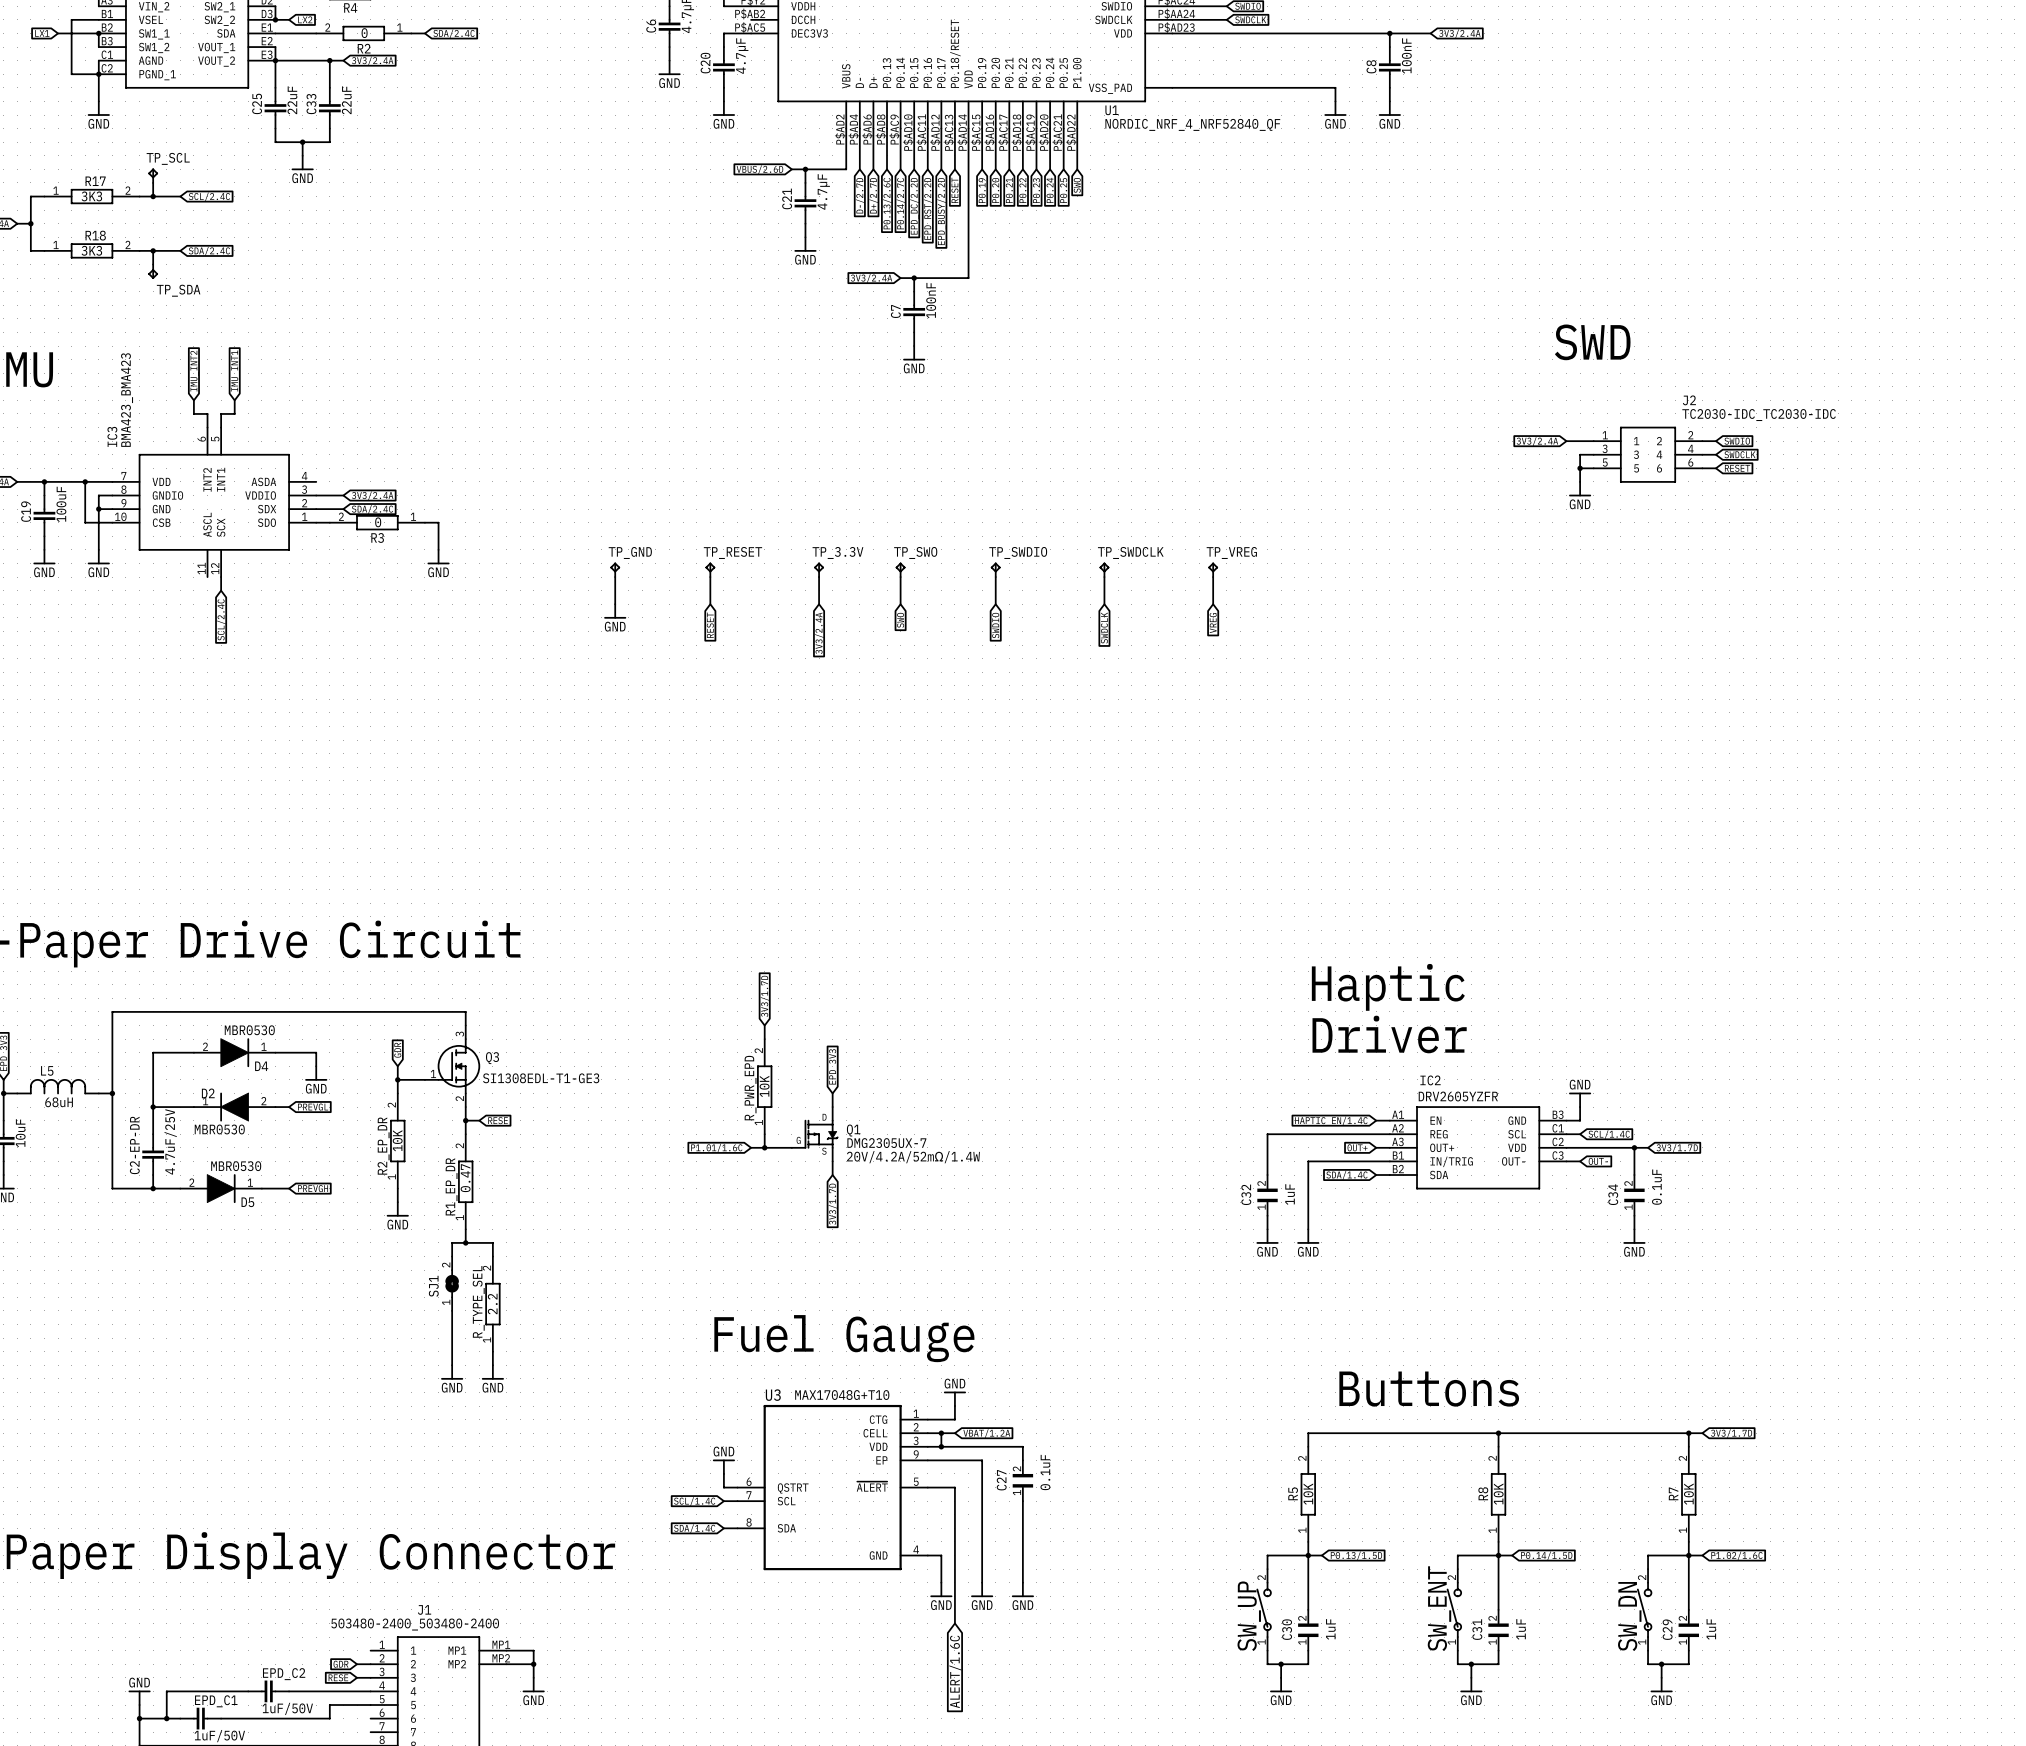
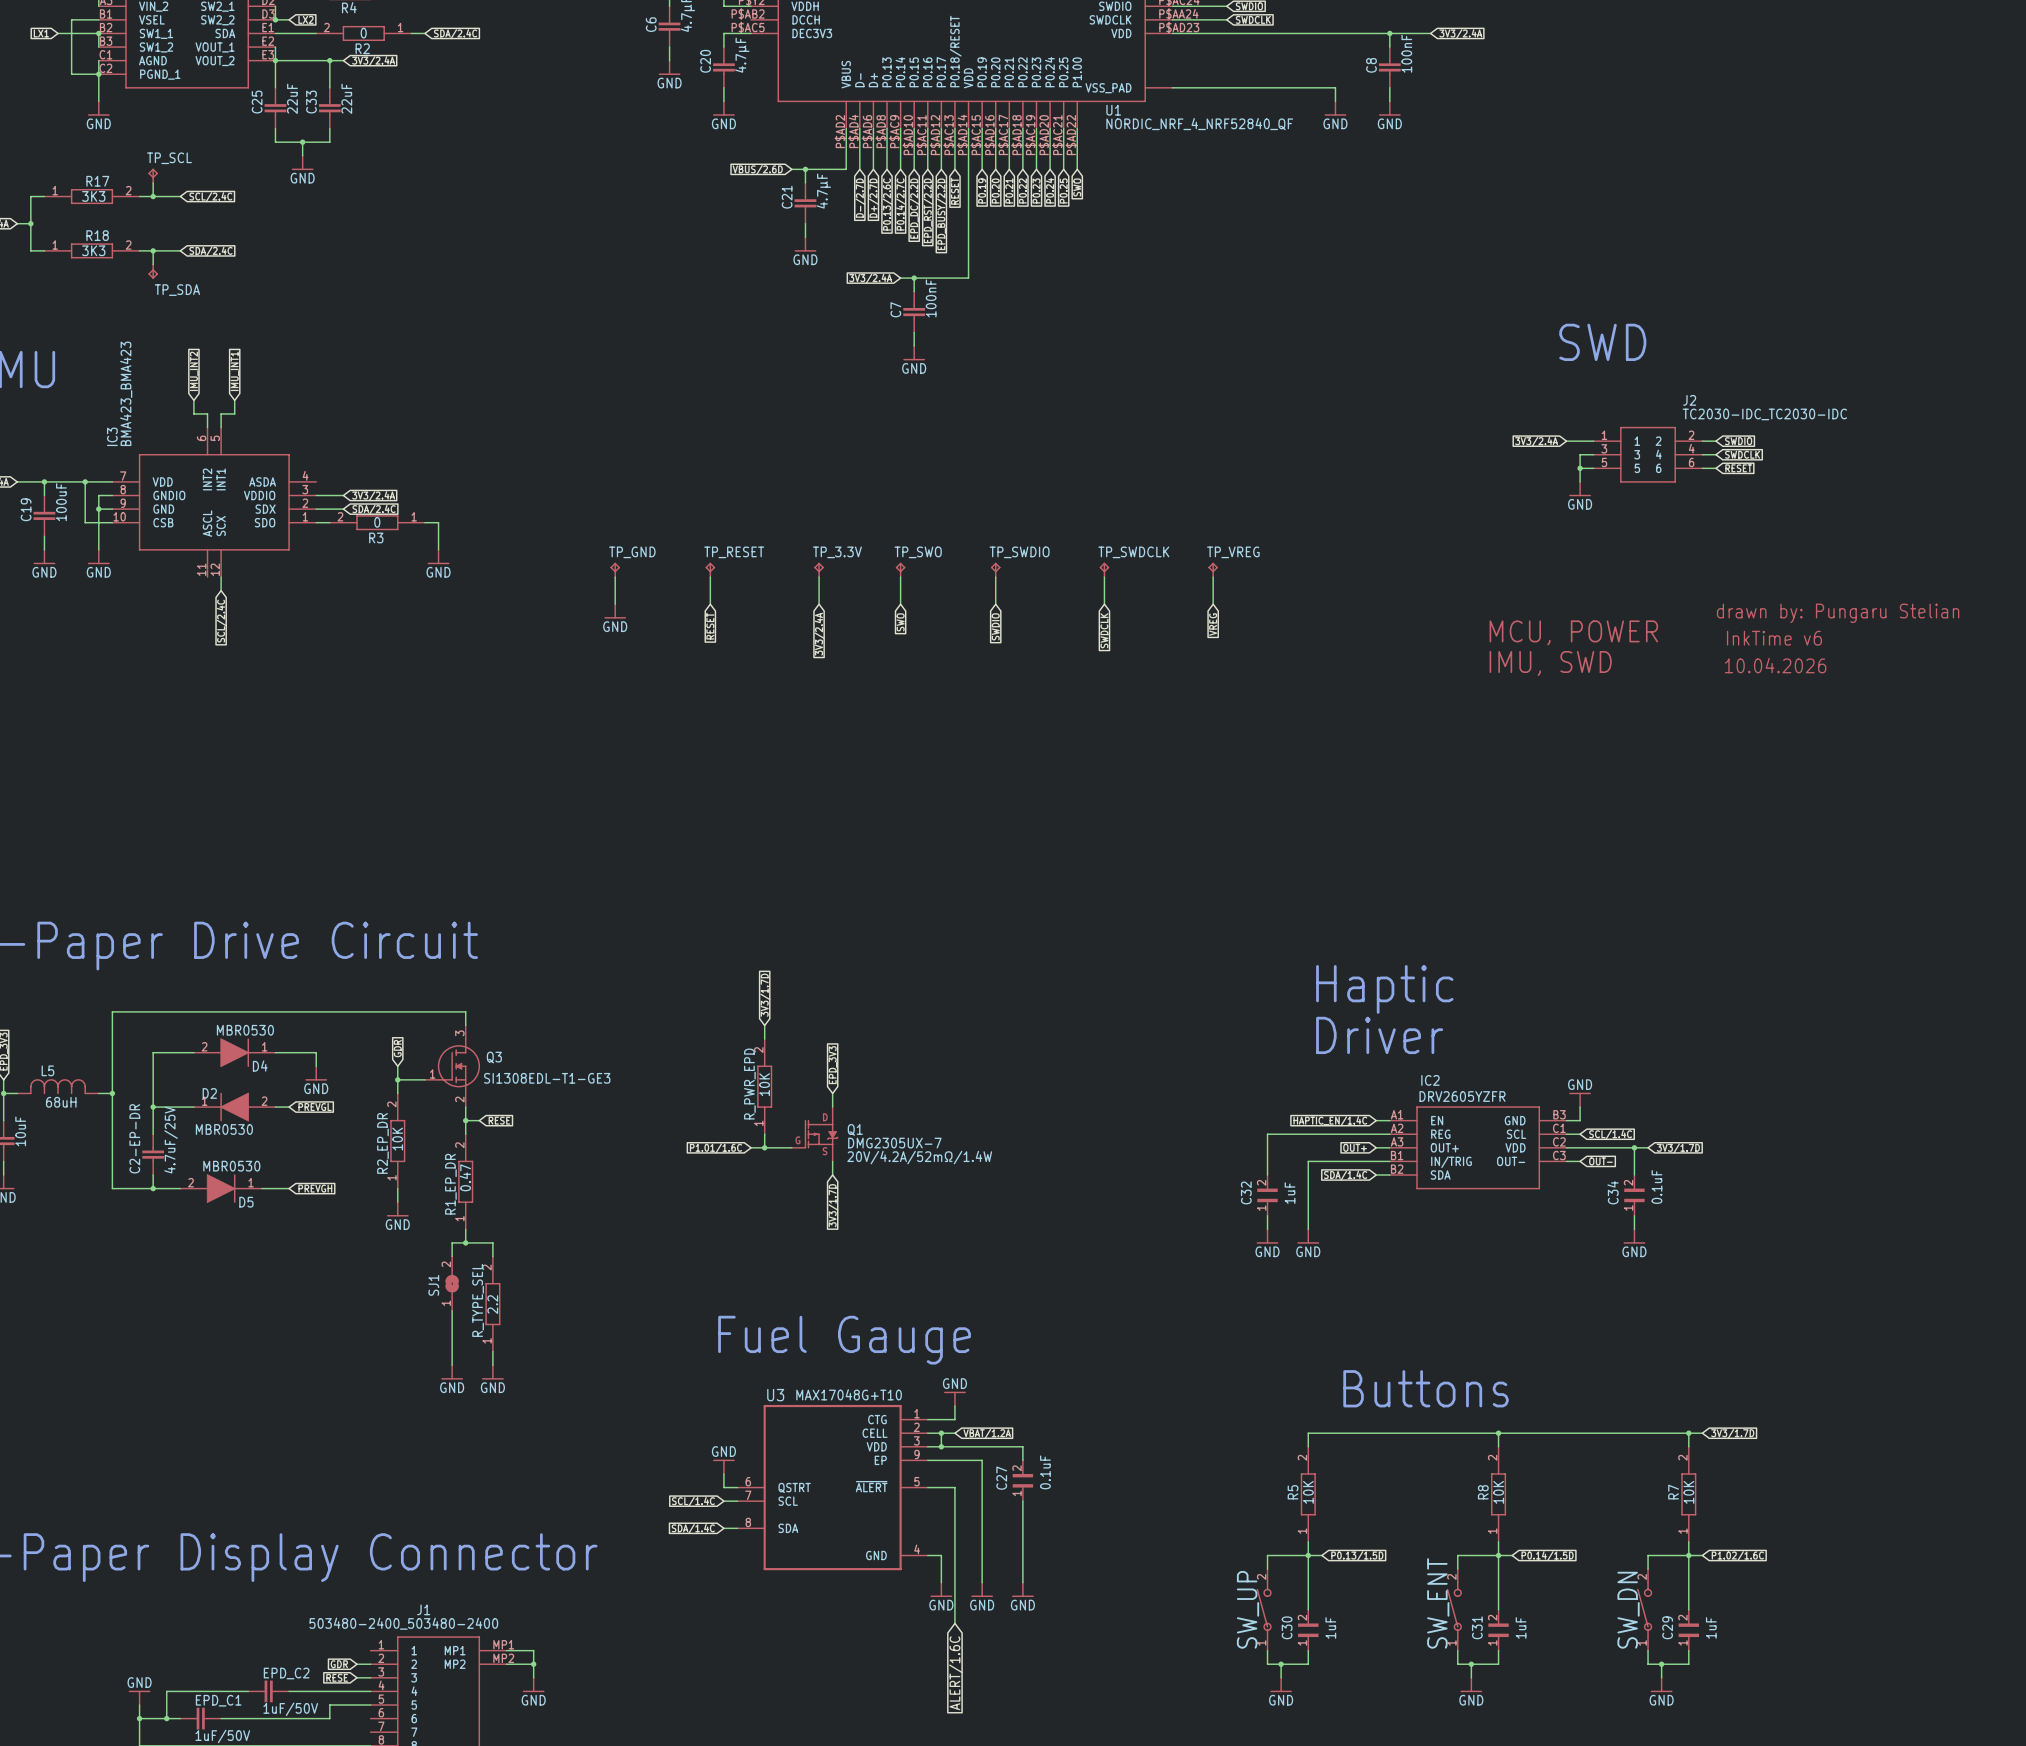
text: none -> drawn by: Pungaru Stelian (1838, 613)
text: none -> MCU, POWER (1573, 632)
text: none -> InkTime v6 (1774, 638)
text: none -> IMU, SWD (1550, 663)
text: none -> 10.04.2026 (1775, 665)

